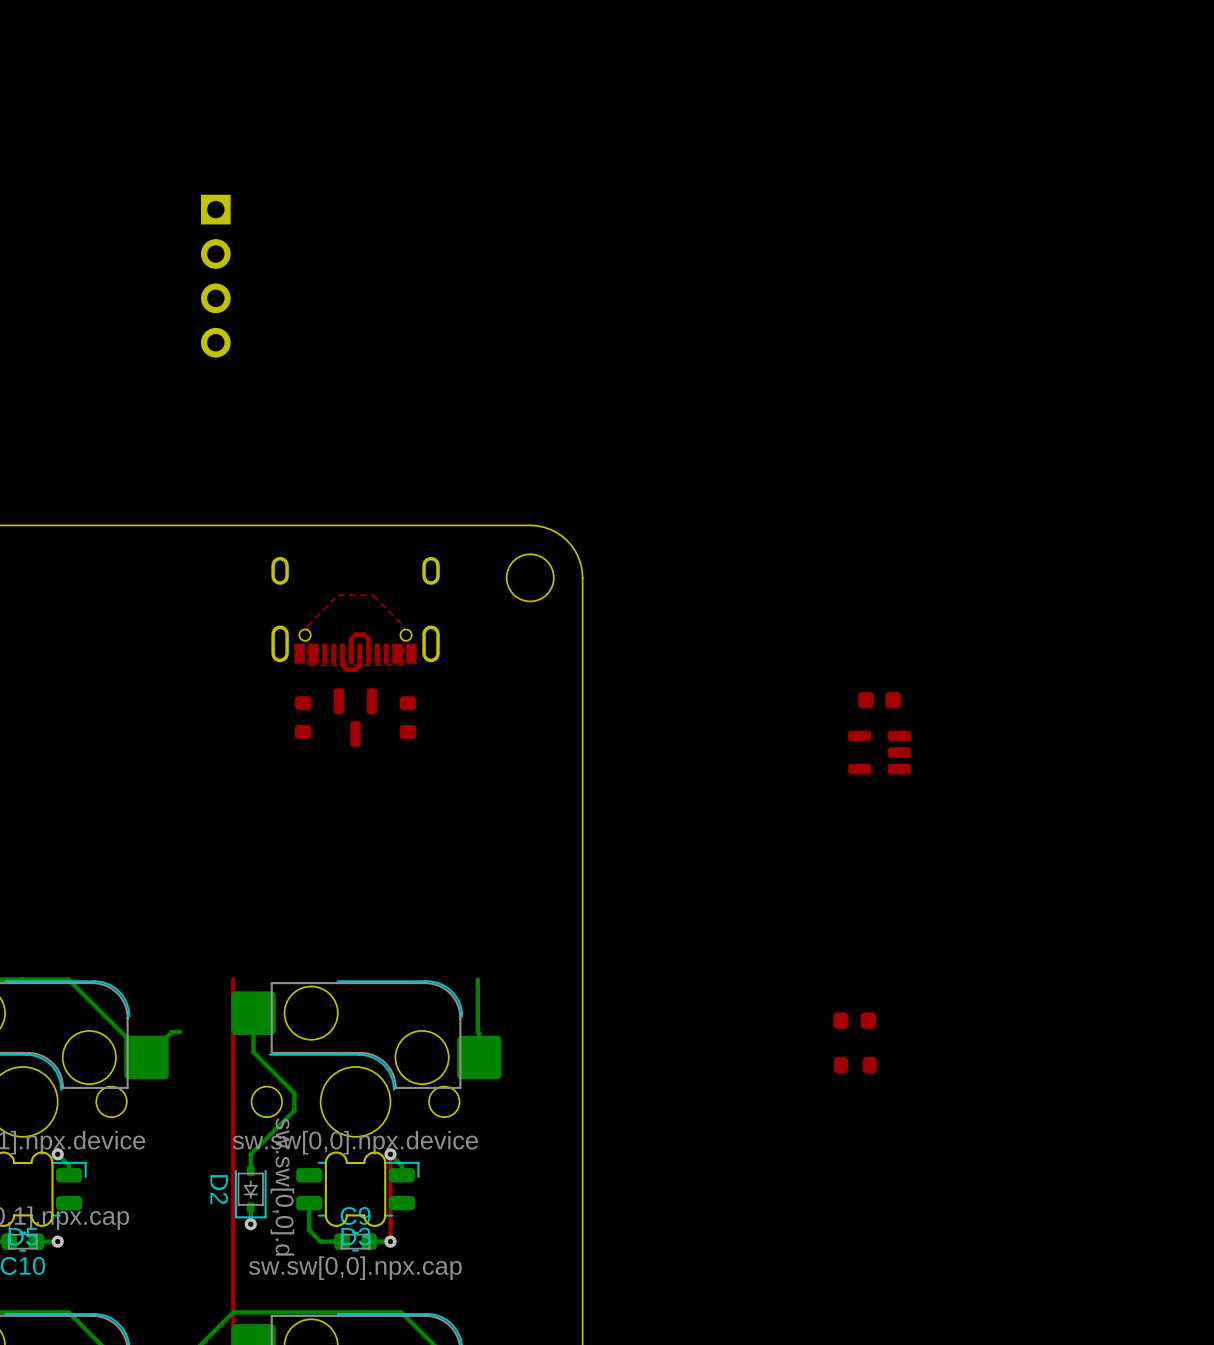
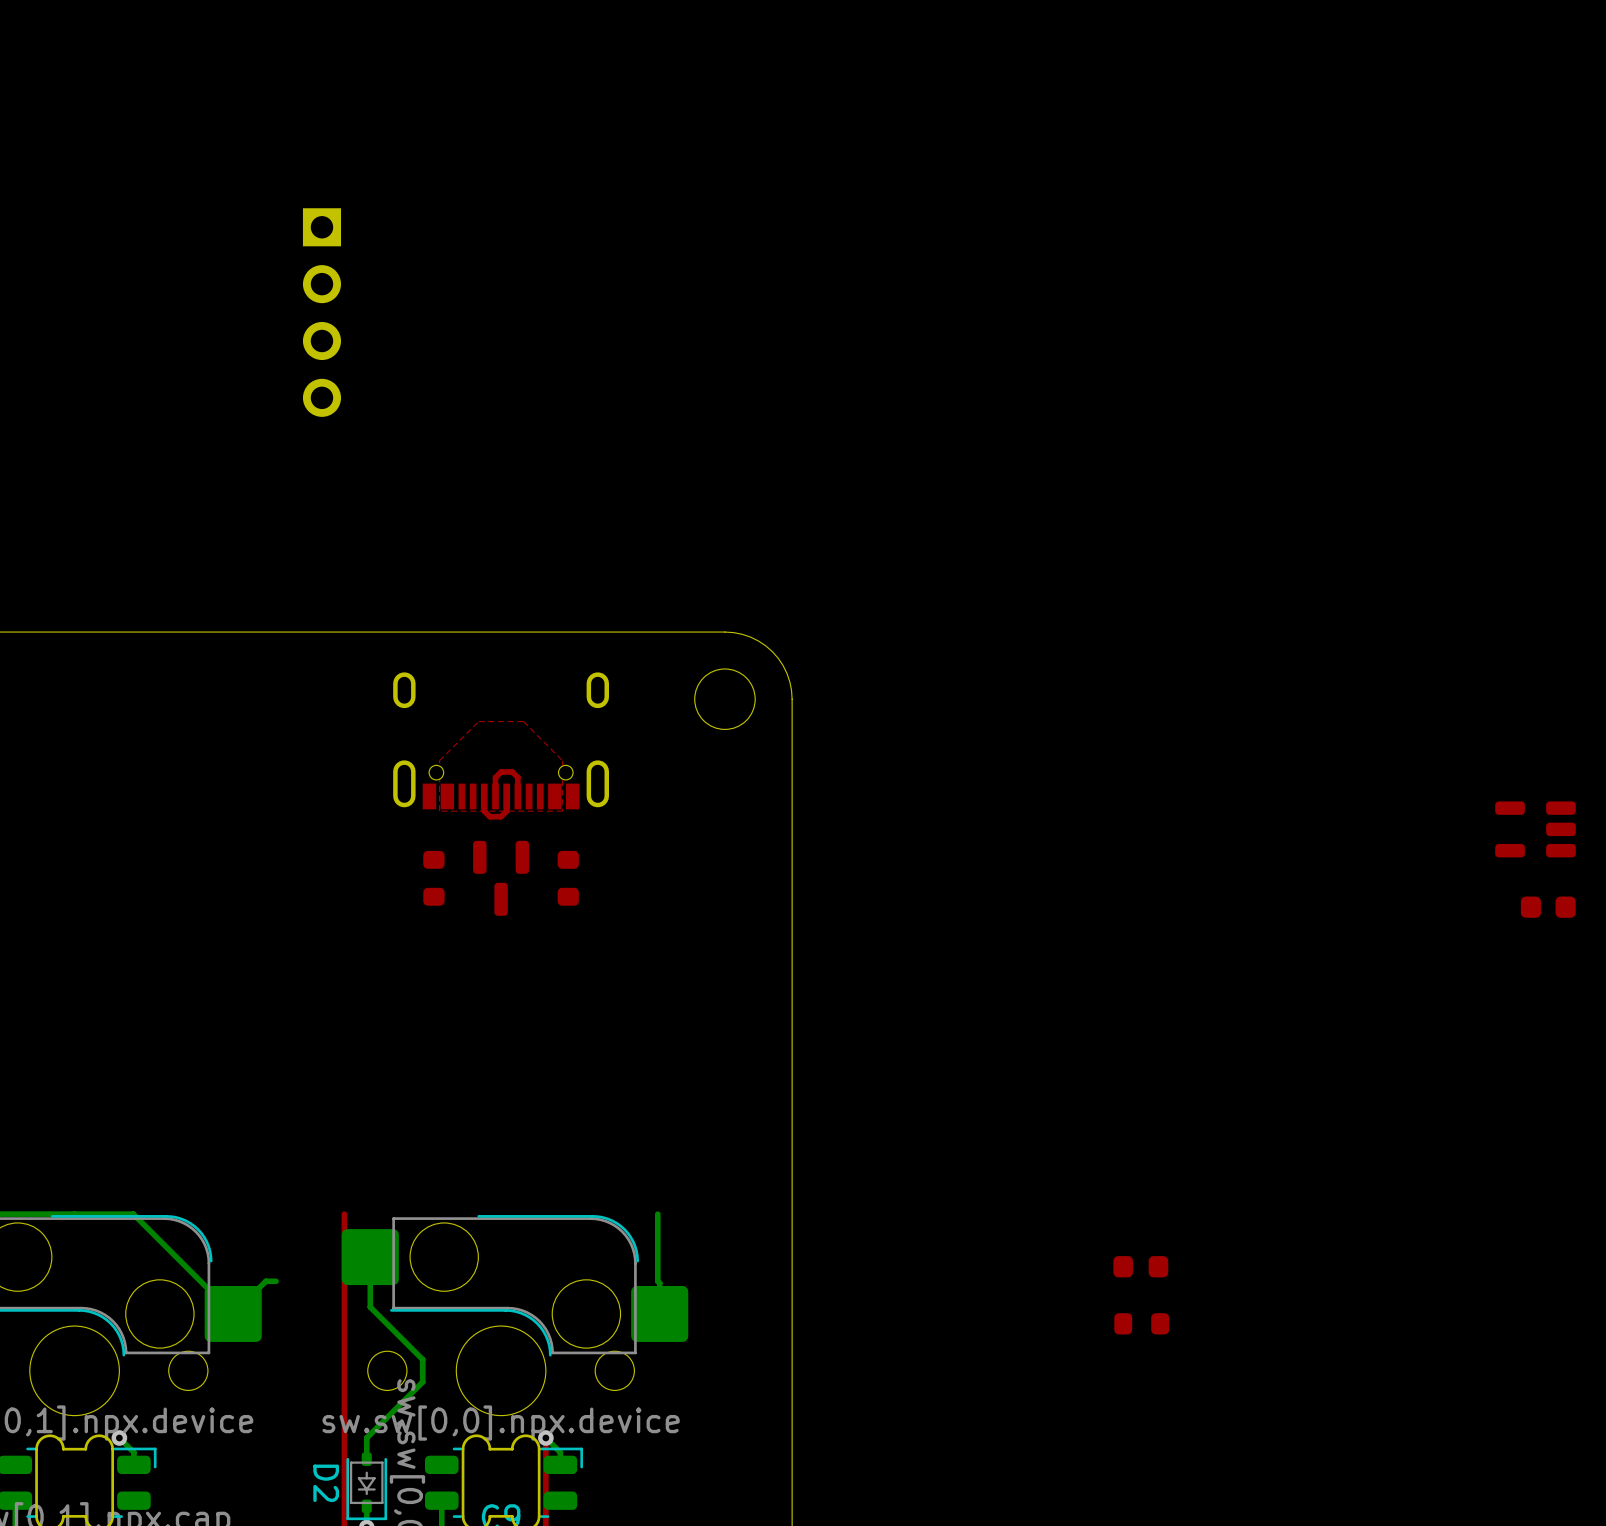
part position: (879, 700) -> (1548, 907)
part position: (879, 752) -> (1535, 829)

